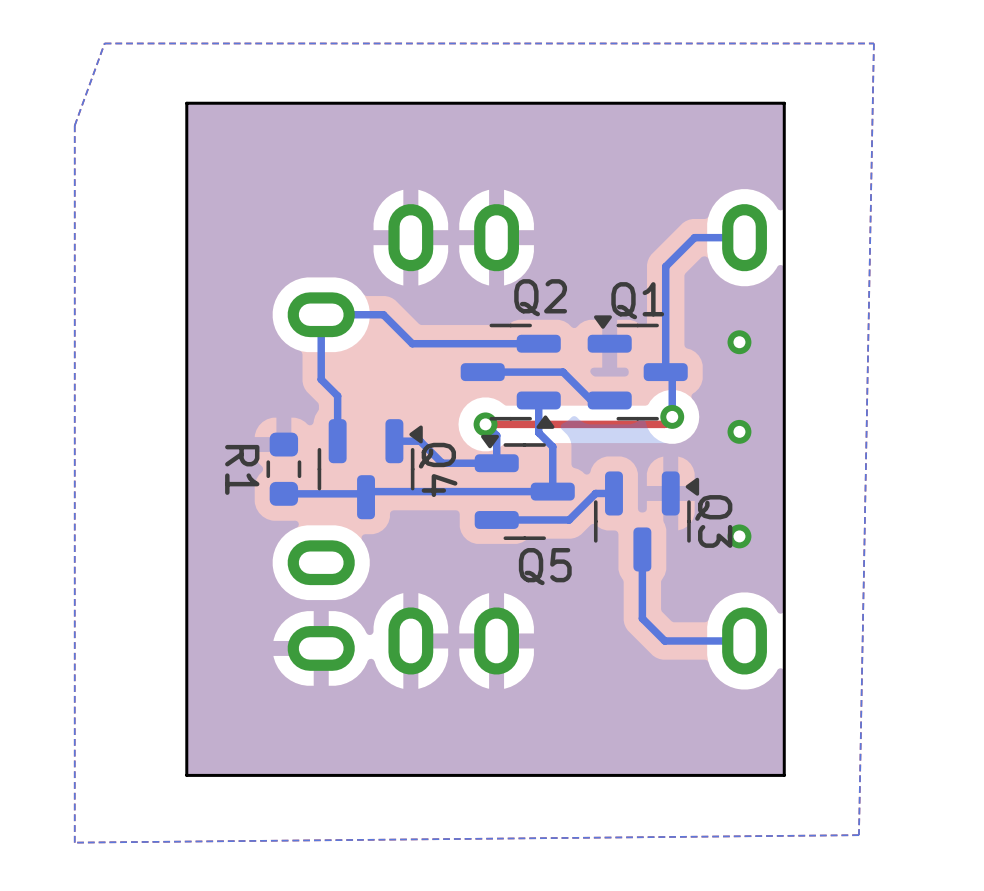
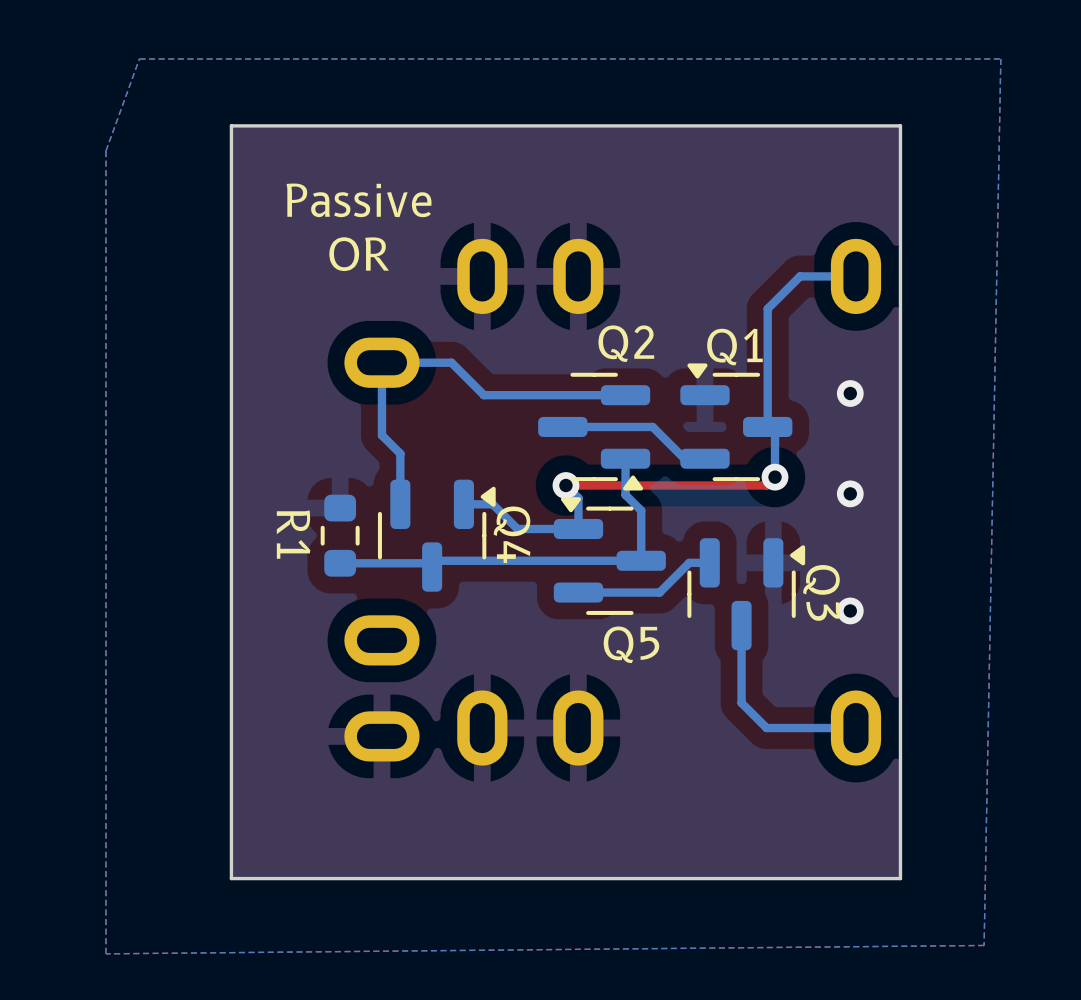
text: none -> Passive (359, 200)
text: none -> OR (359, 254)

